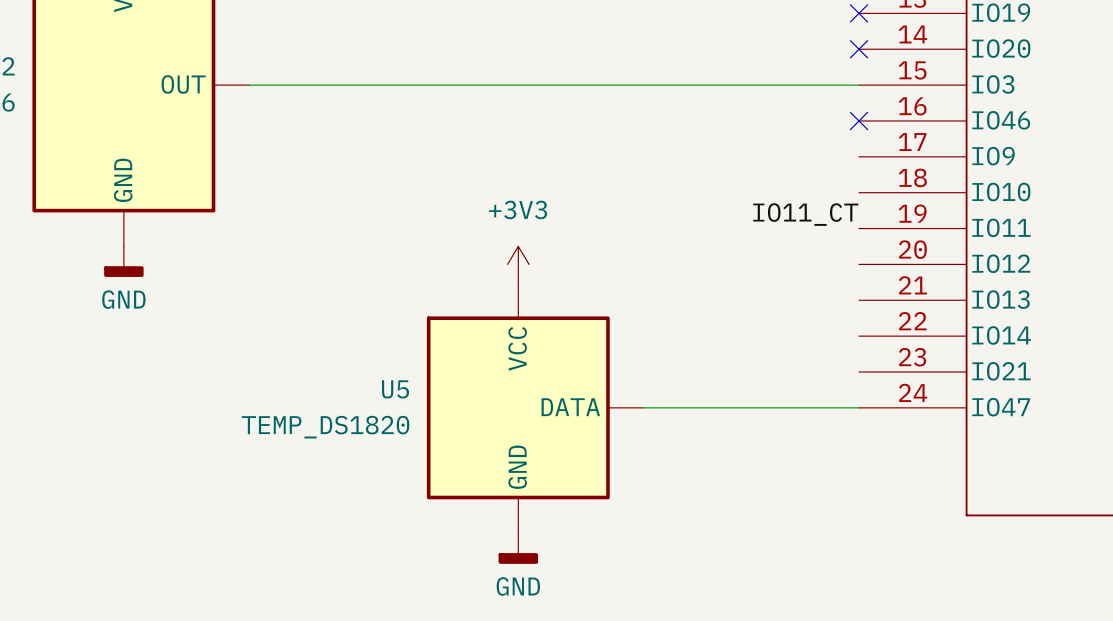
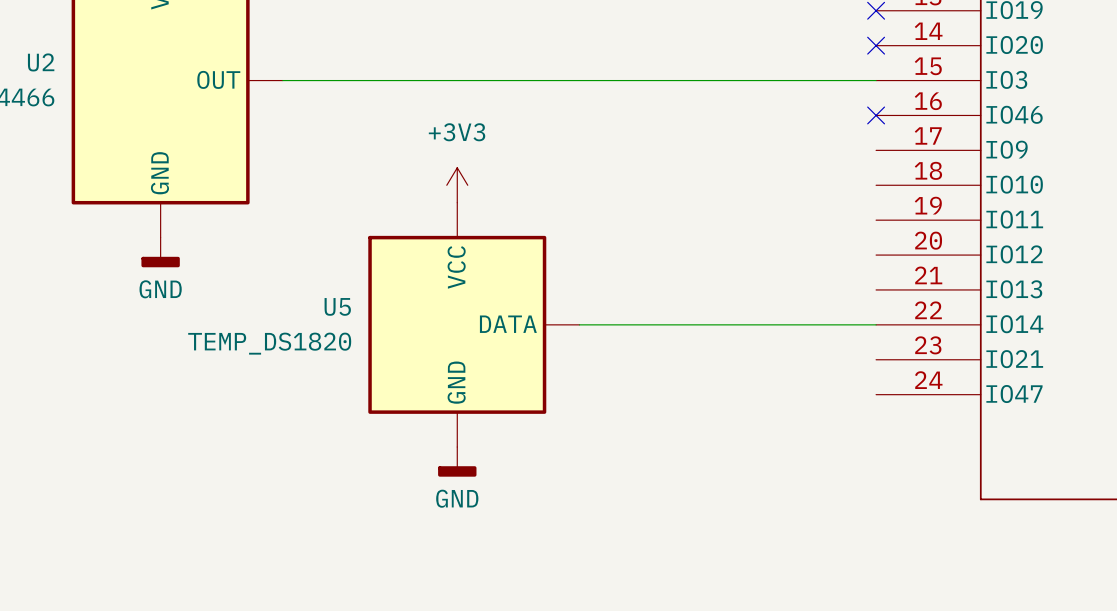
label: IO11_CT (805, 214) -> none
power symbol position: +3V3 (518, 264) -> +3V3 (457, 185)
wire: none -> (579, 324) (876, 324)
U5 position: (535, 407) -> (473, 324)
wire: (643, 407) (859, 407) -> none
power symbol position: GND (518, 548) -> GND (457, 461)

